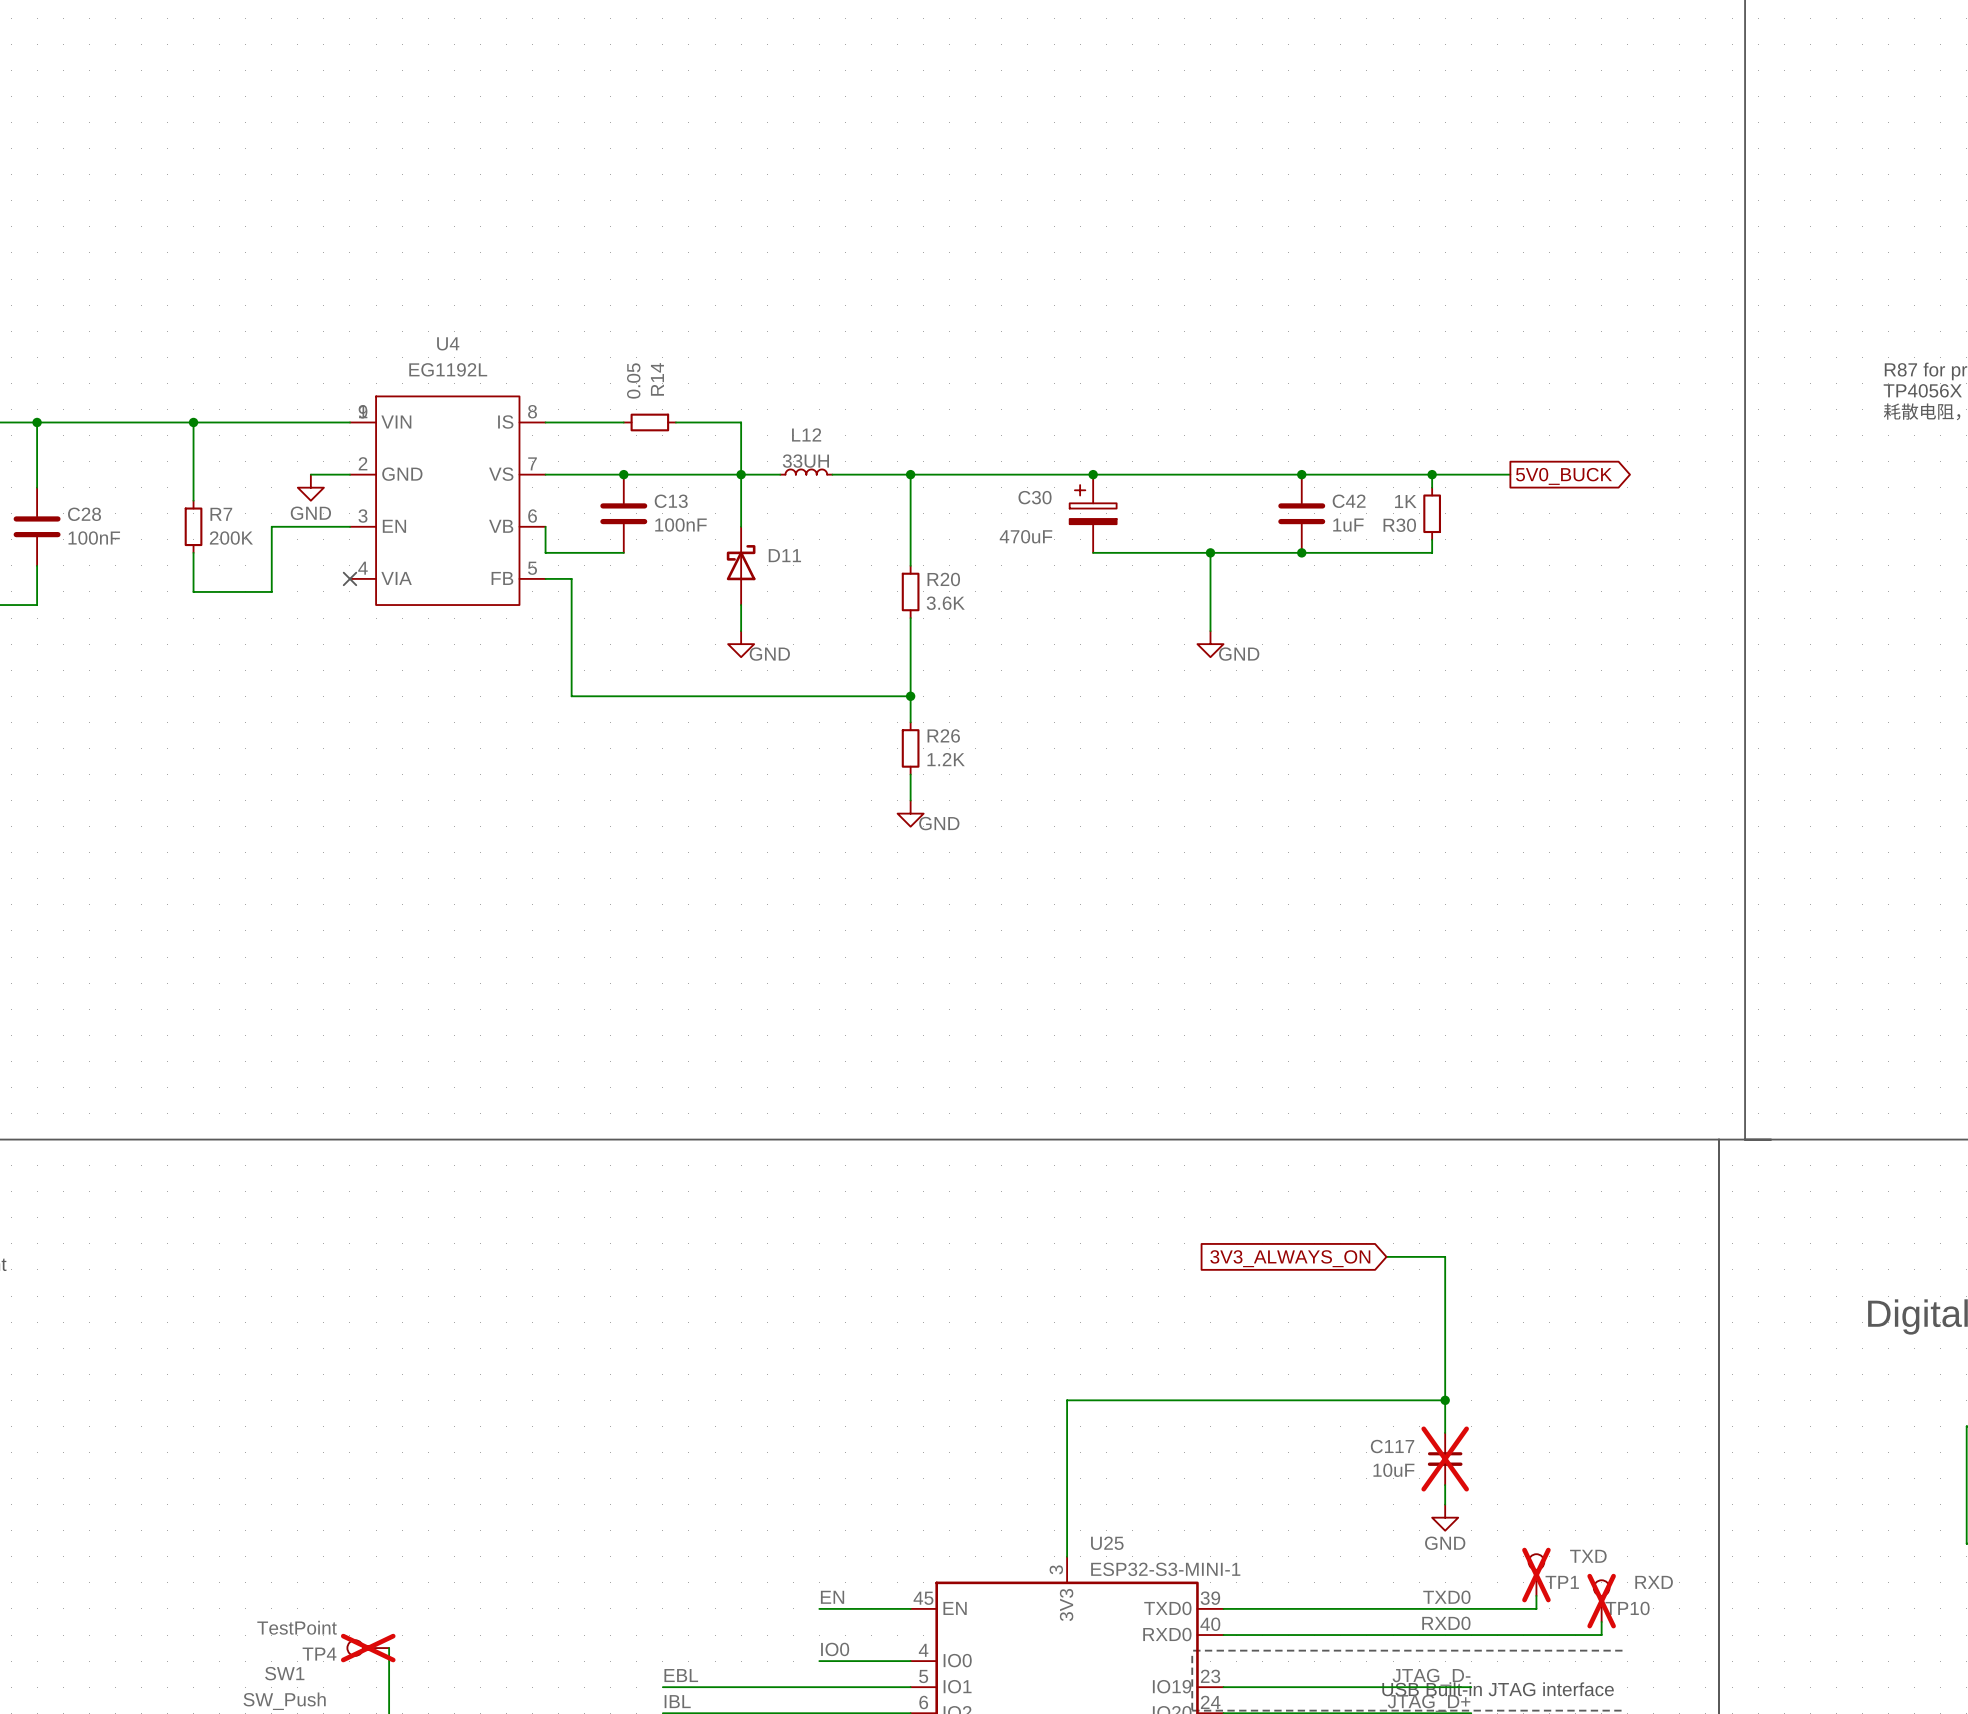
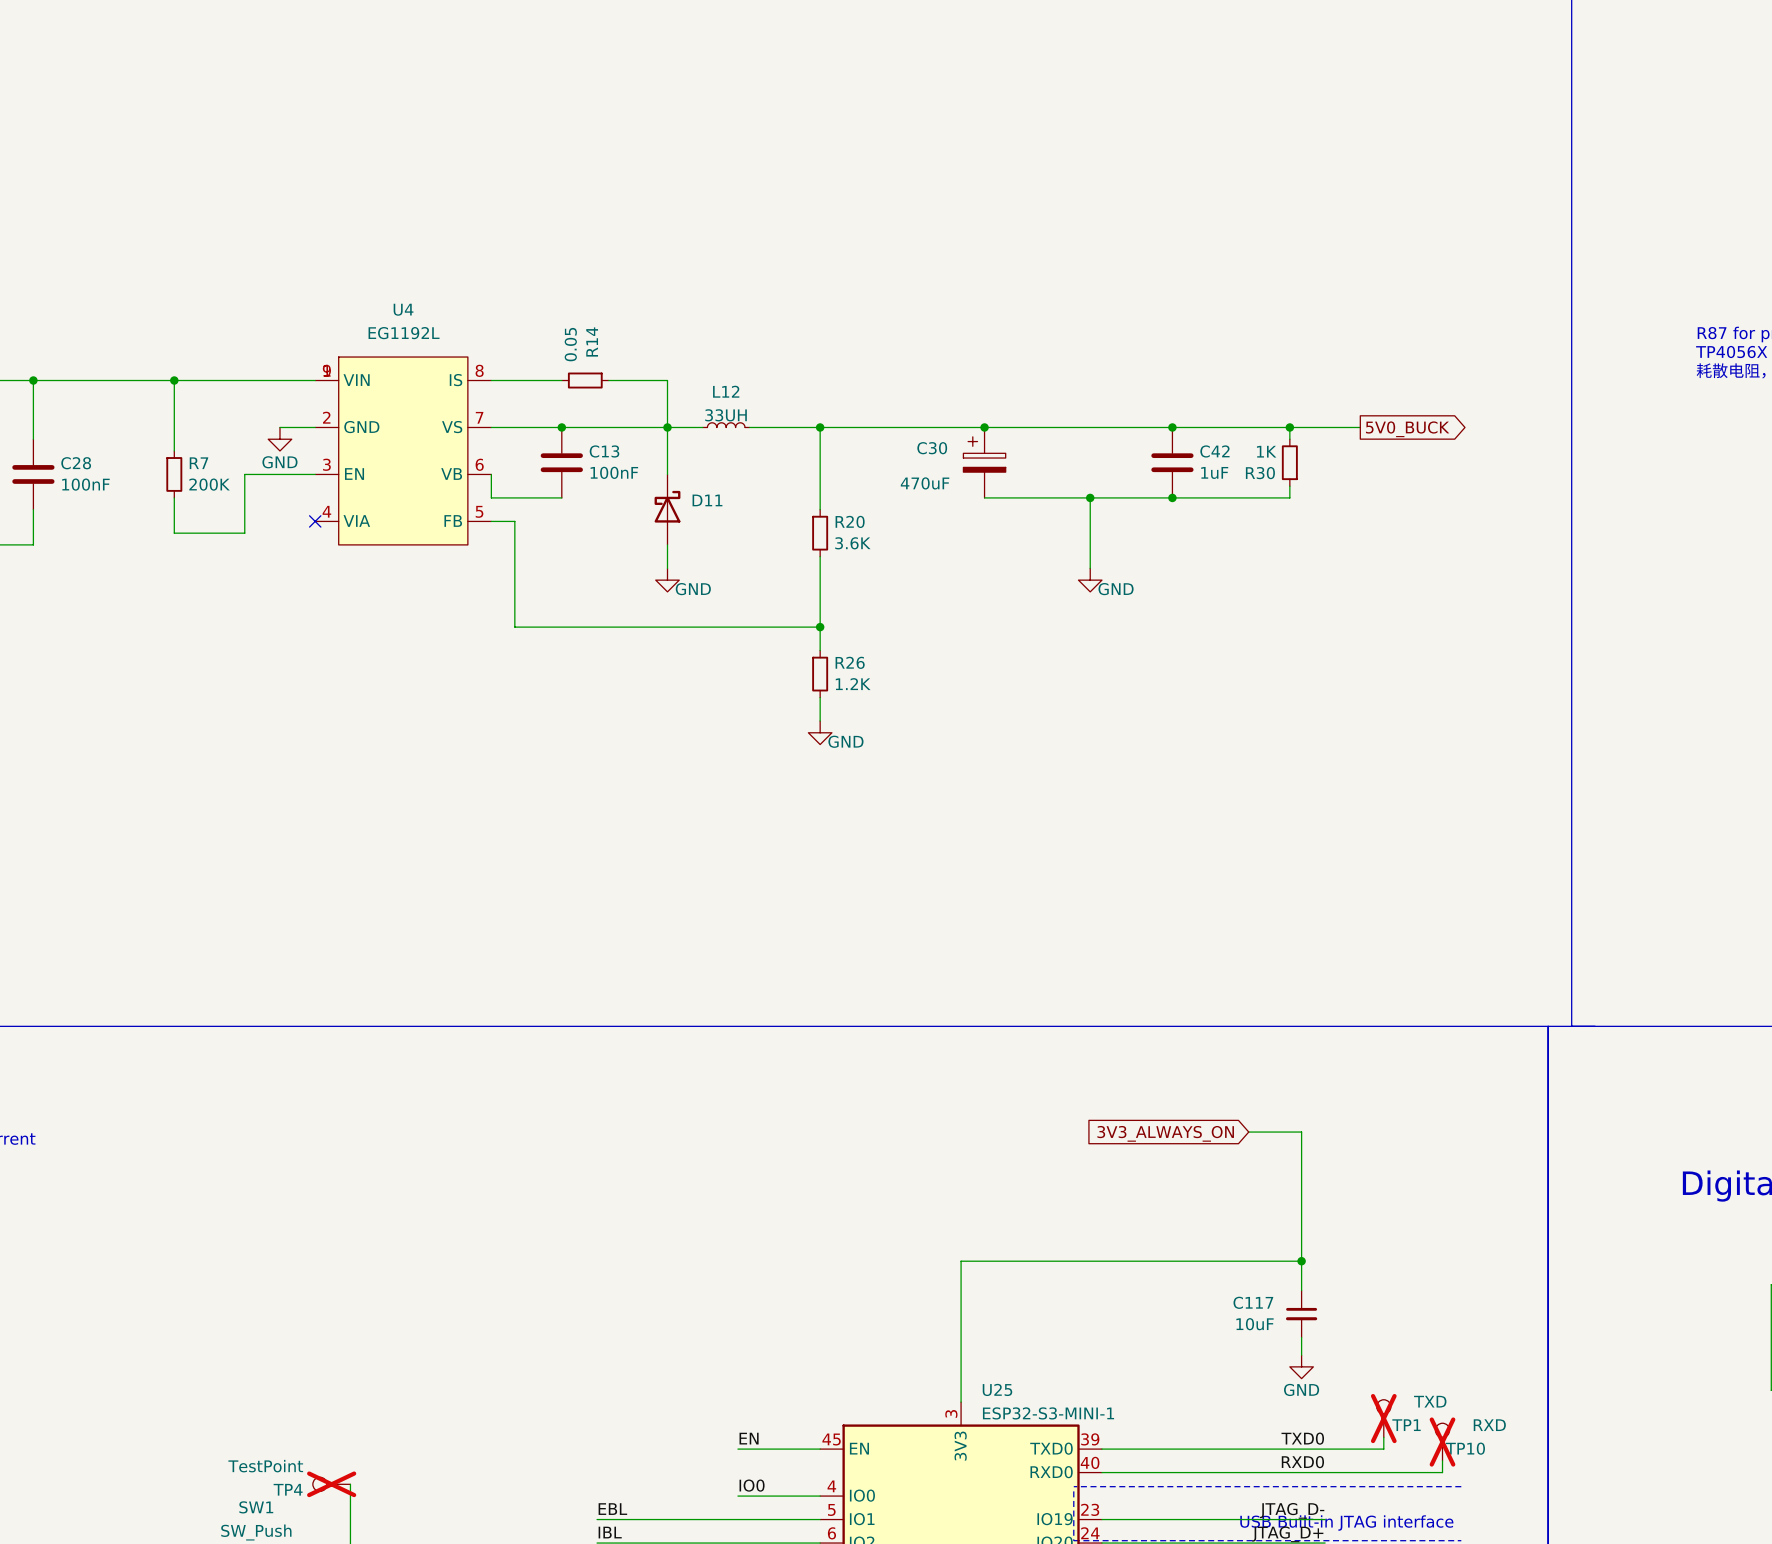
C117 do-not-place cross: (1445, 1459) -> none

